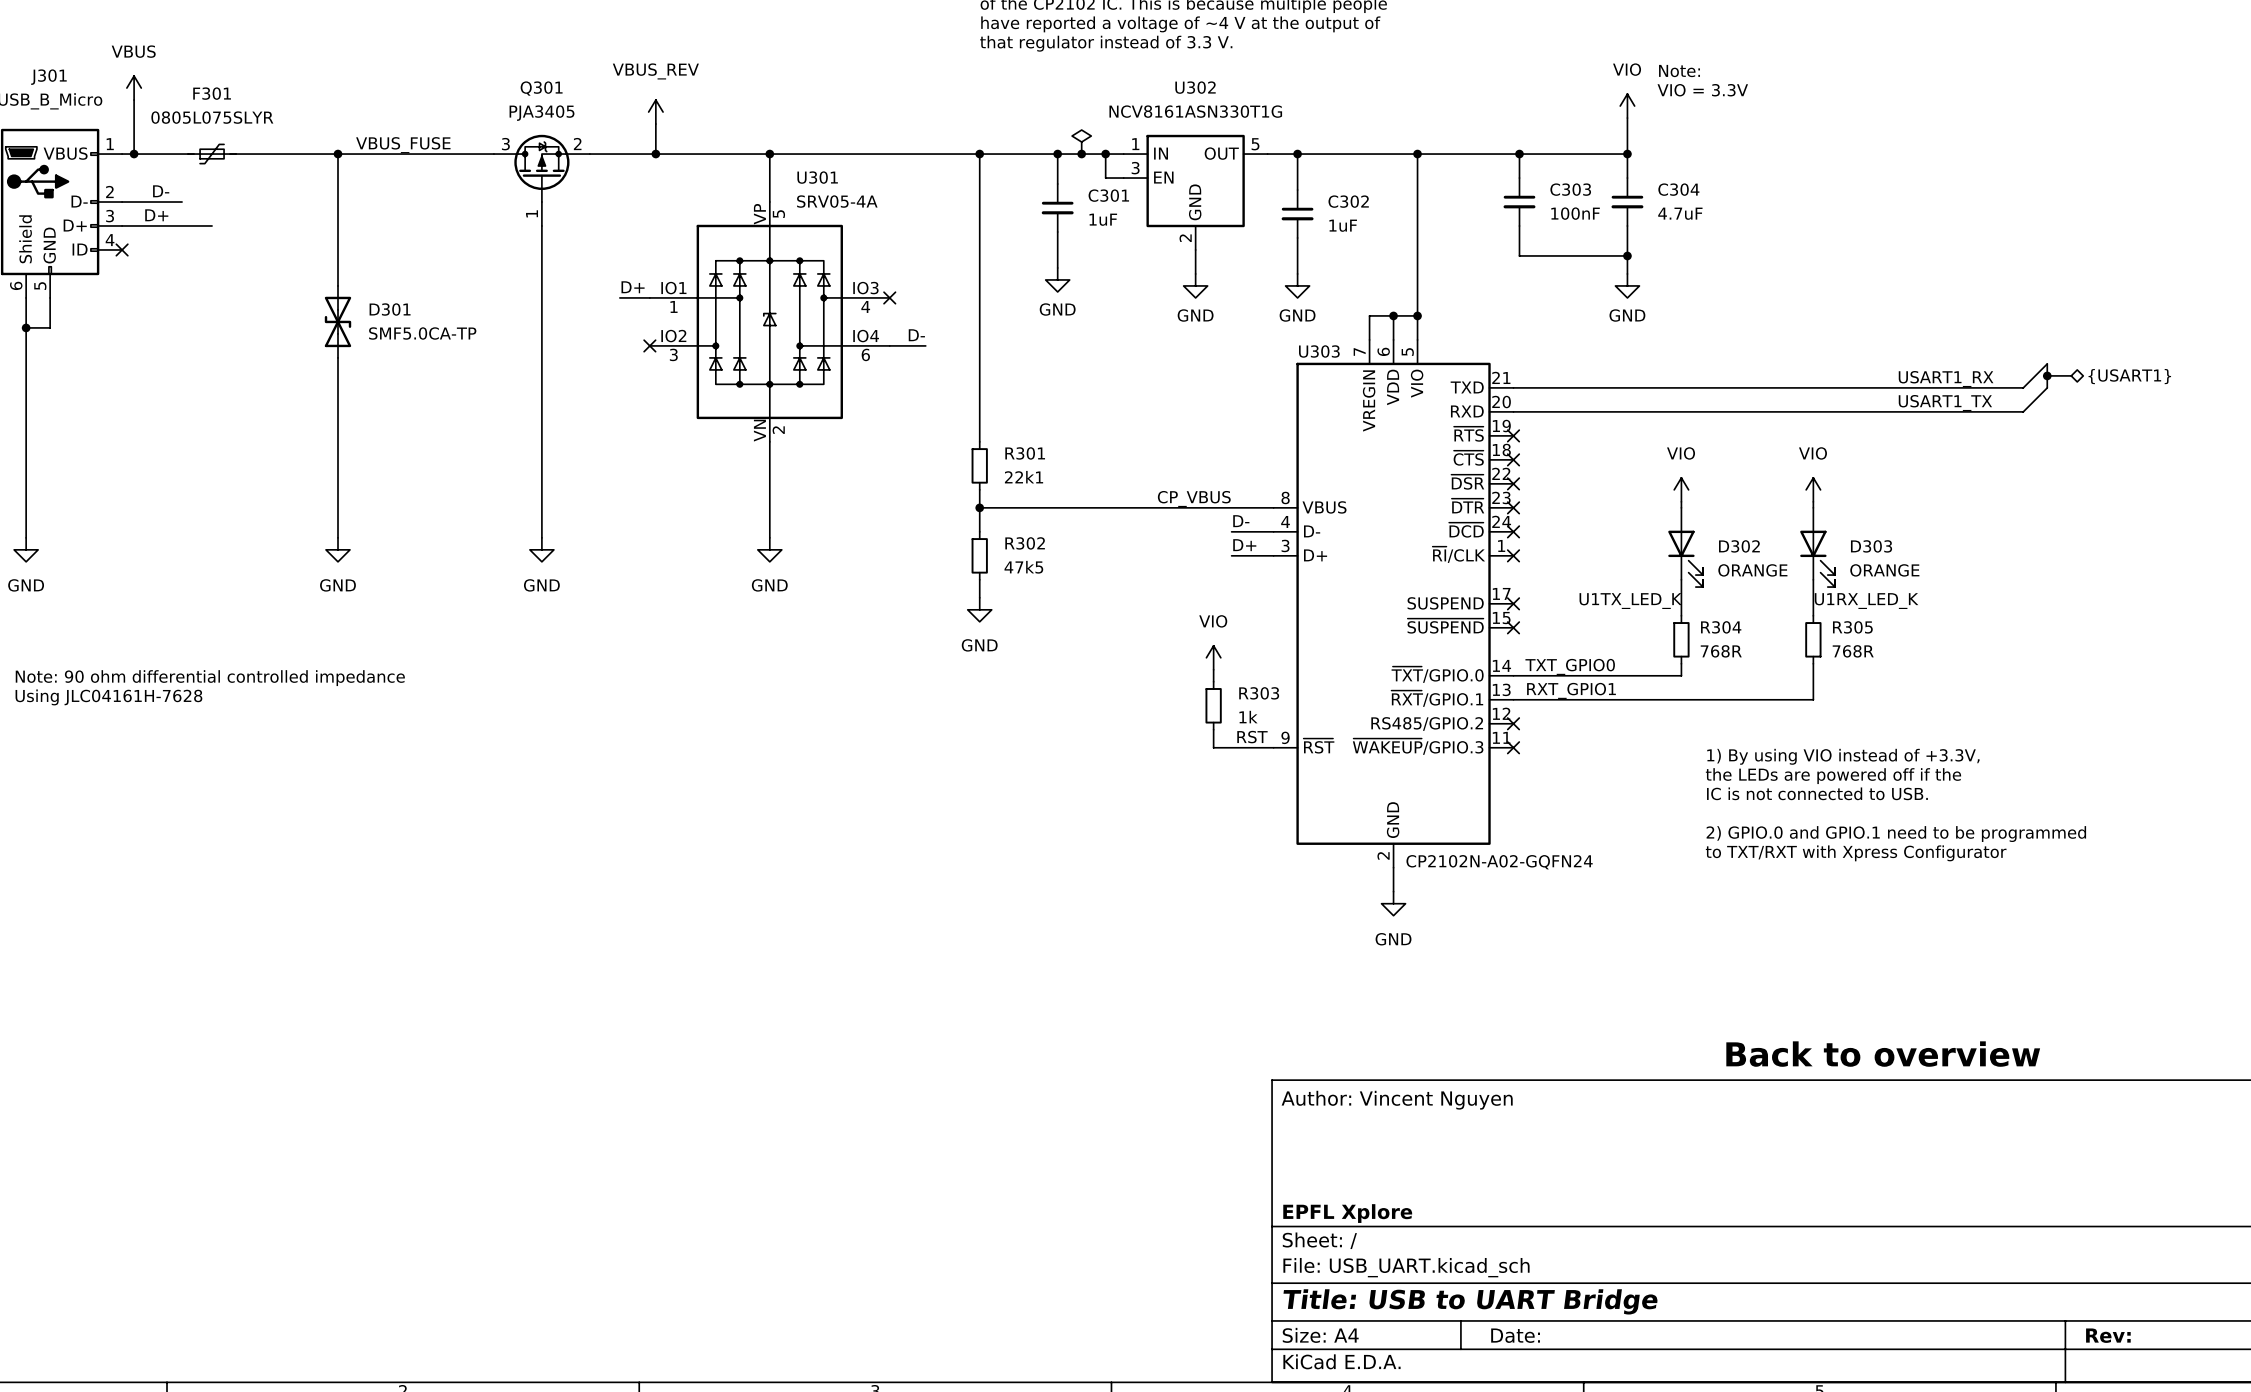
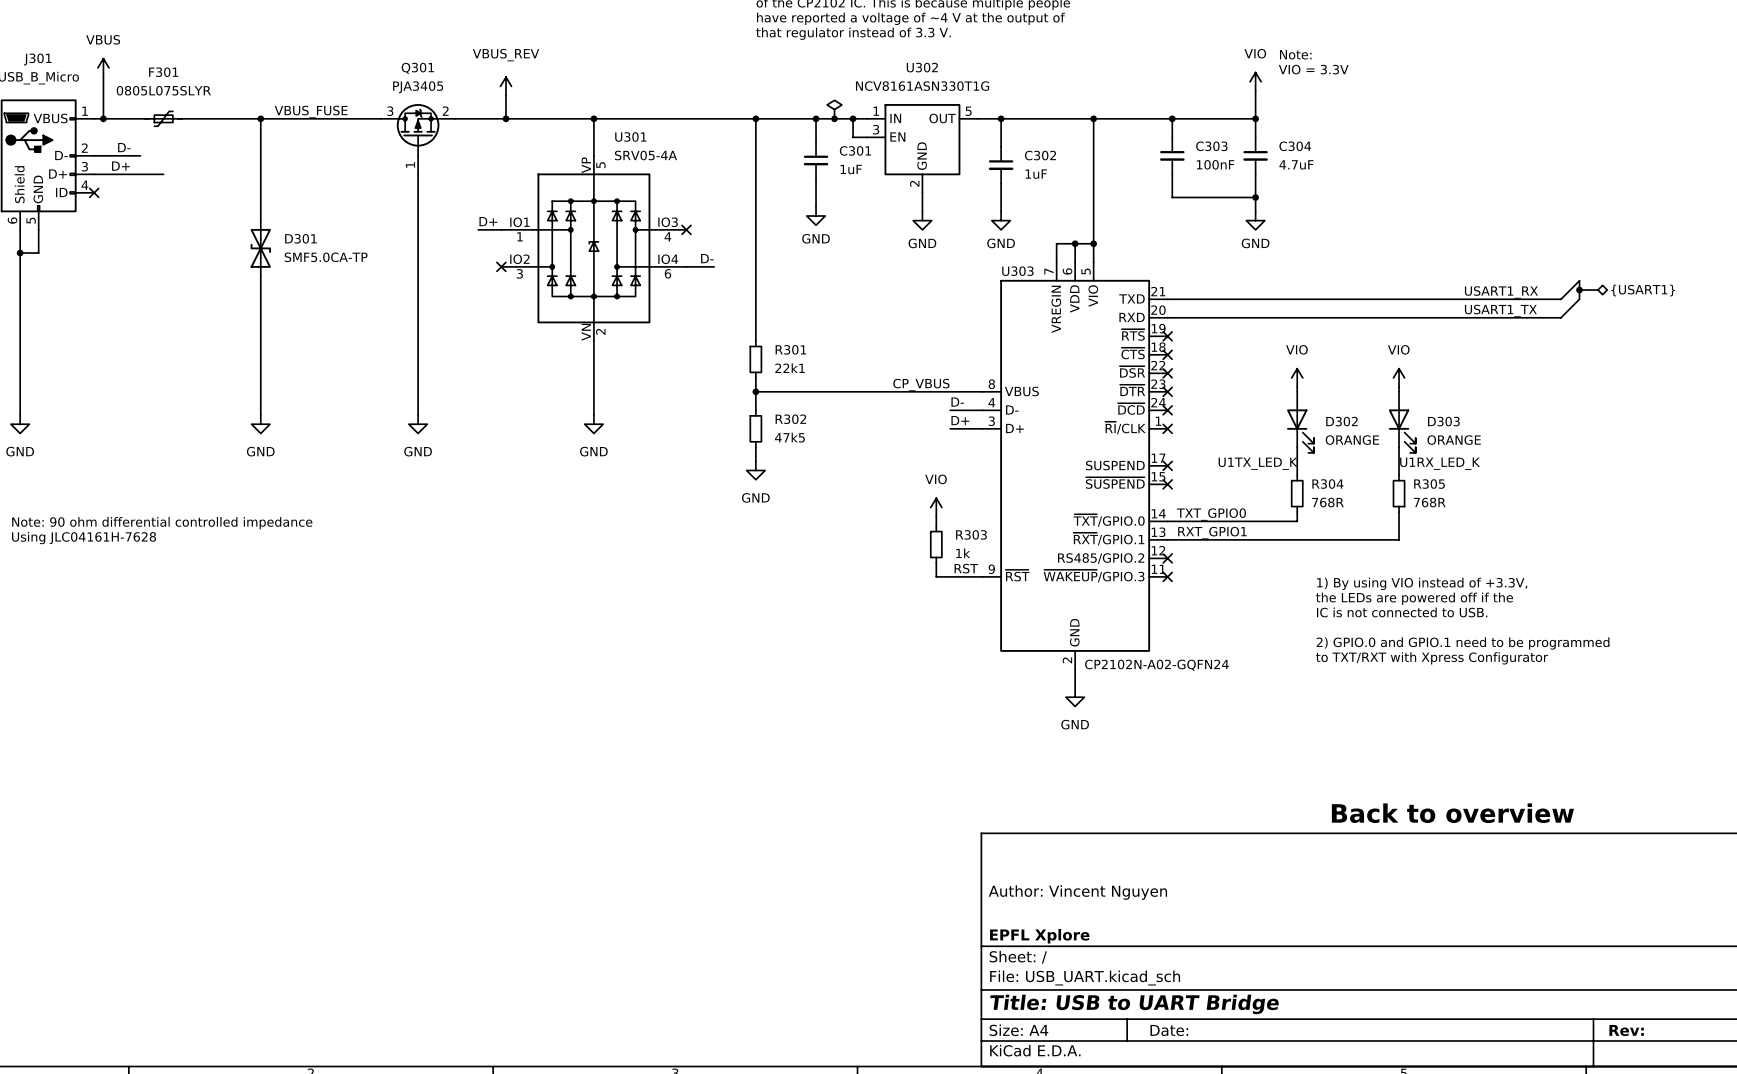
title block position: Author: Vincent Nguyen (1397, 1100) -> Author: Vincent Nguyen (1077, 892)

